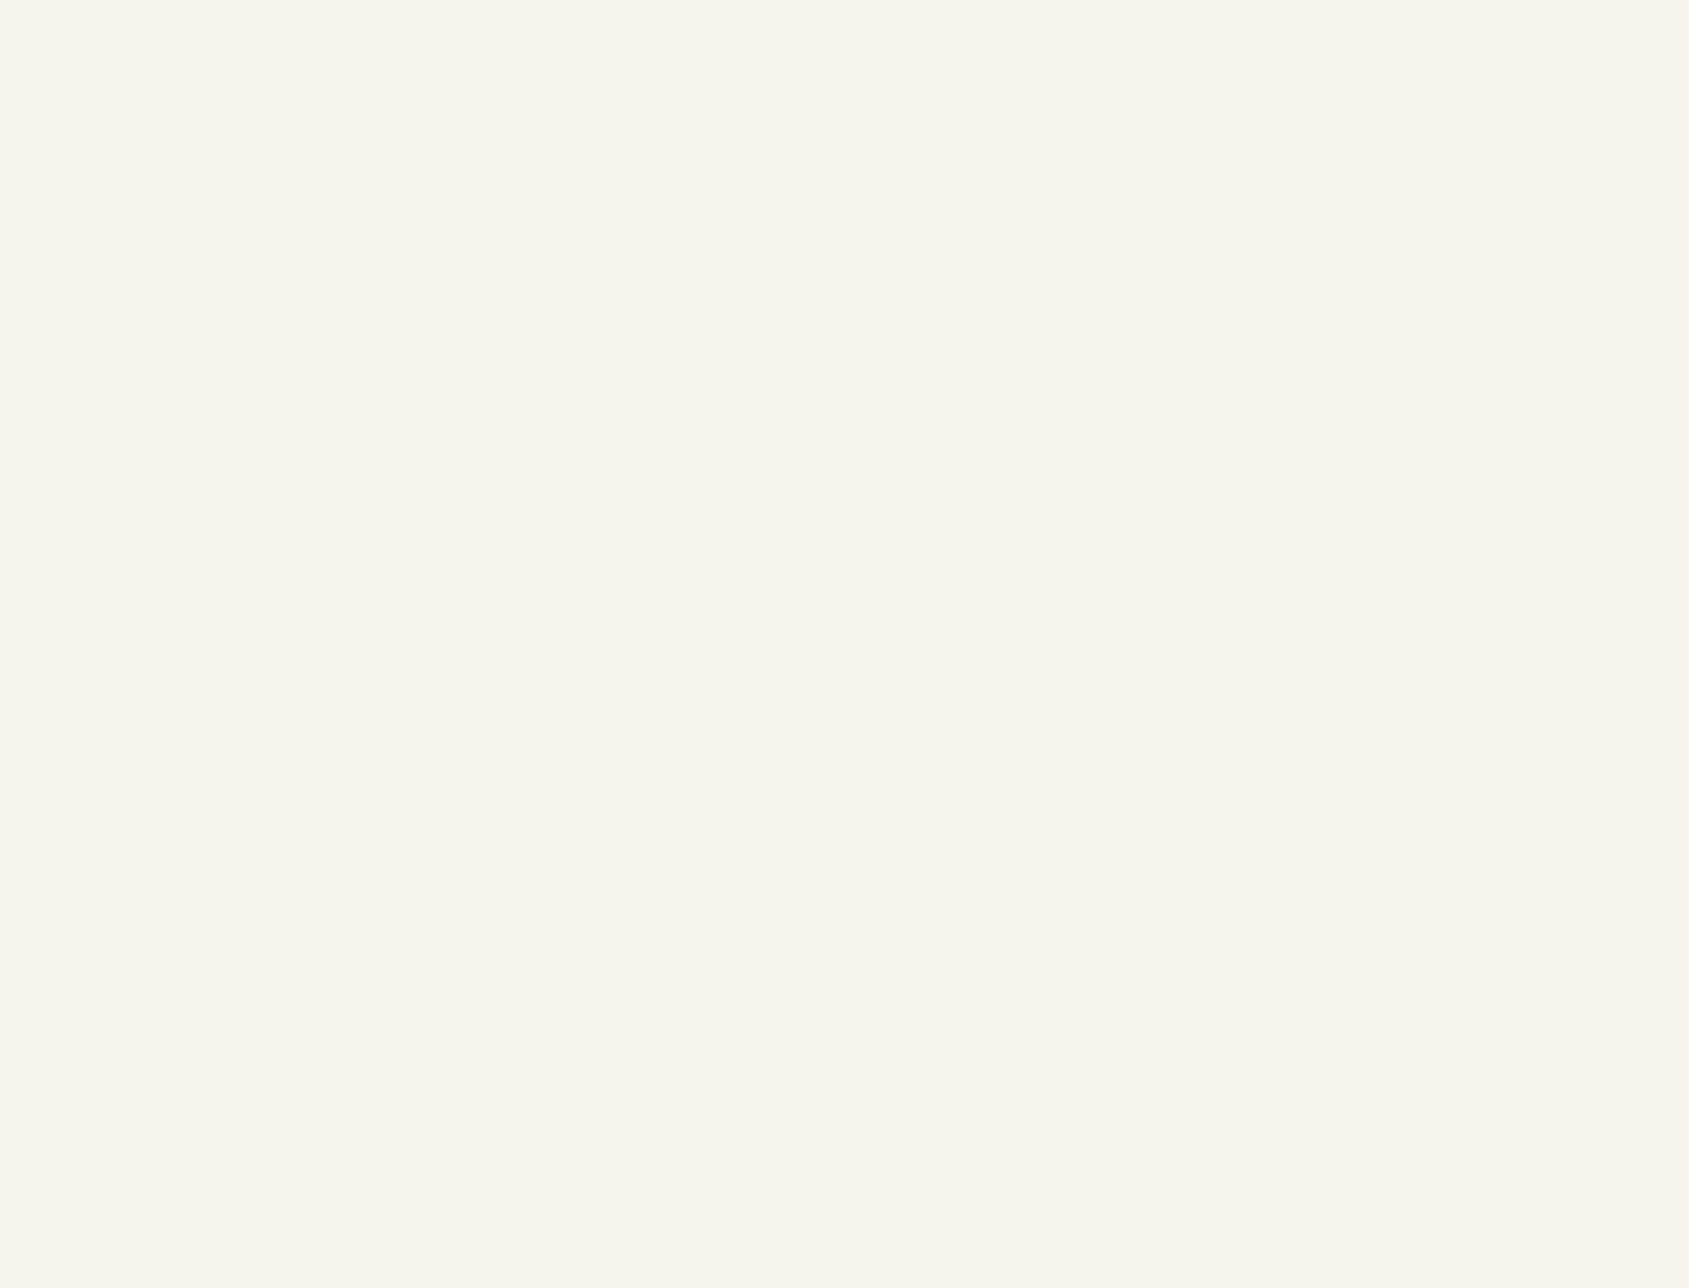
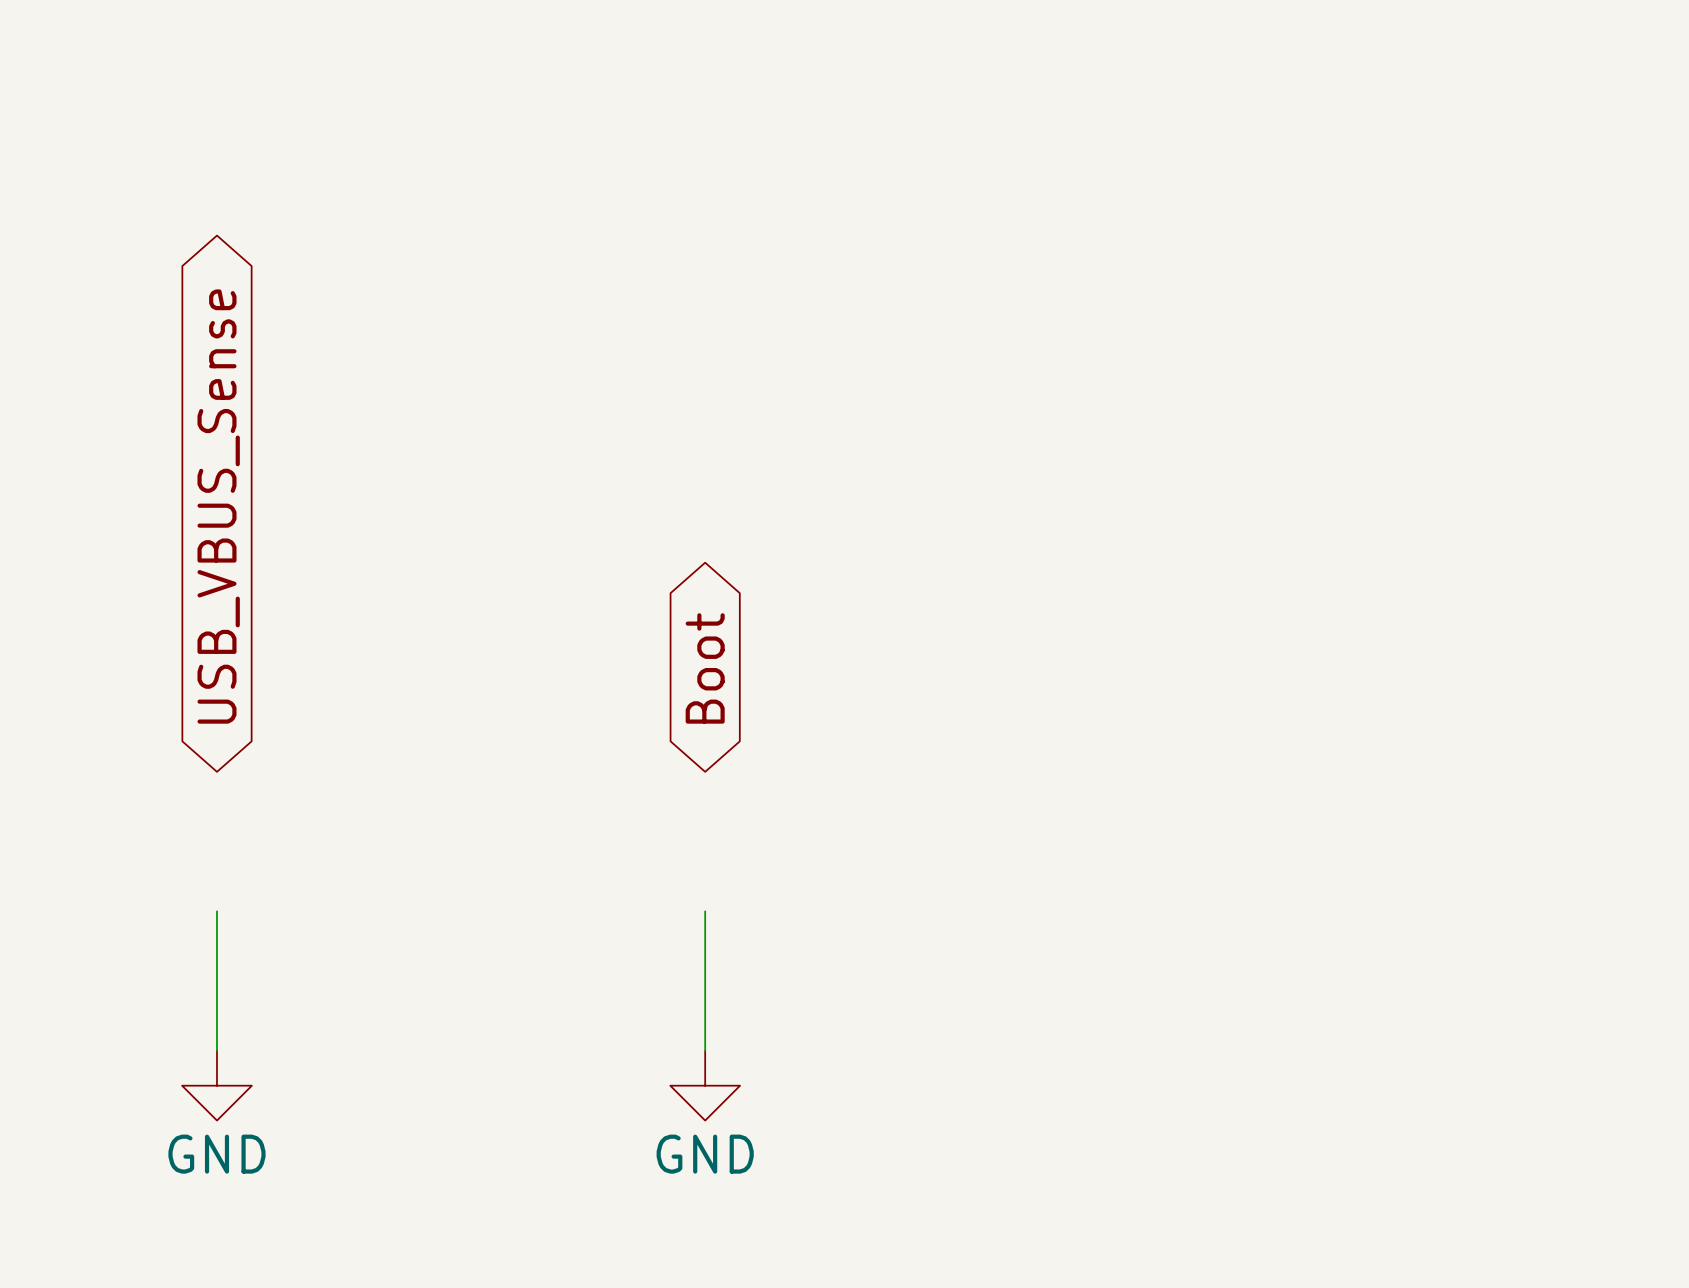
global label: none -> USB_VBUS_Sense (218, 506)
global label: none -> Boot (705, 668)
wire: none -> (216, 911) (216, 1050)
wire: none -> (705, 911) (705, 1050)
power symbol: none -> GND (216, 1085)
power symbol: none -> GND (705, 1085)

